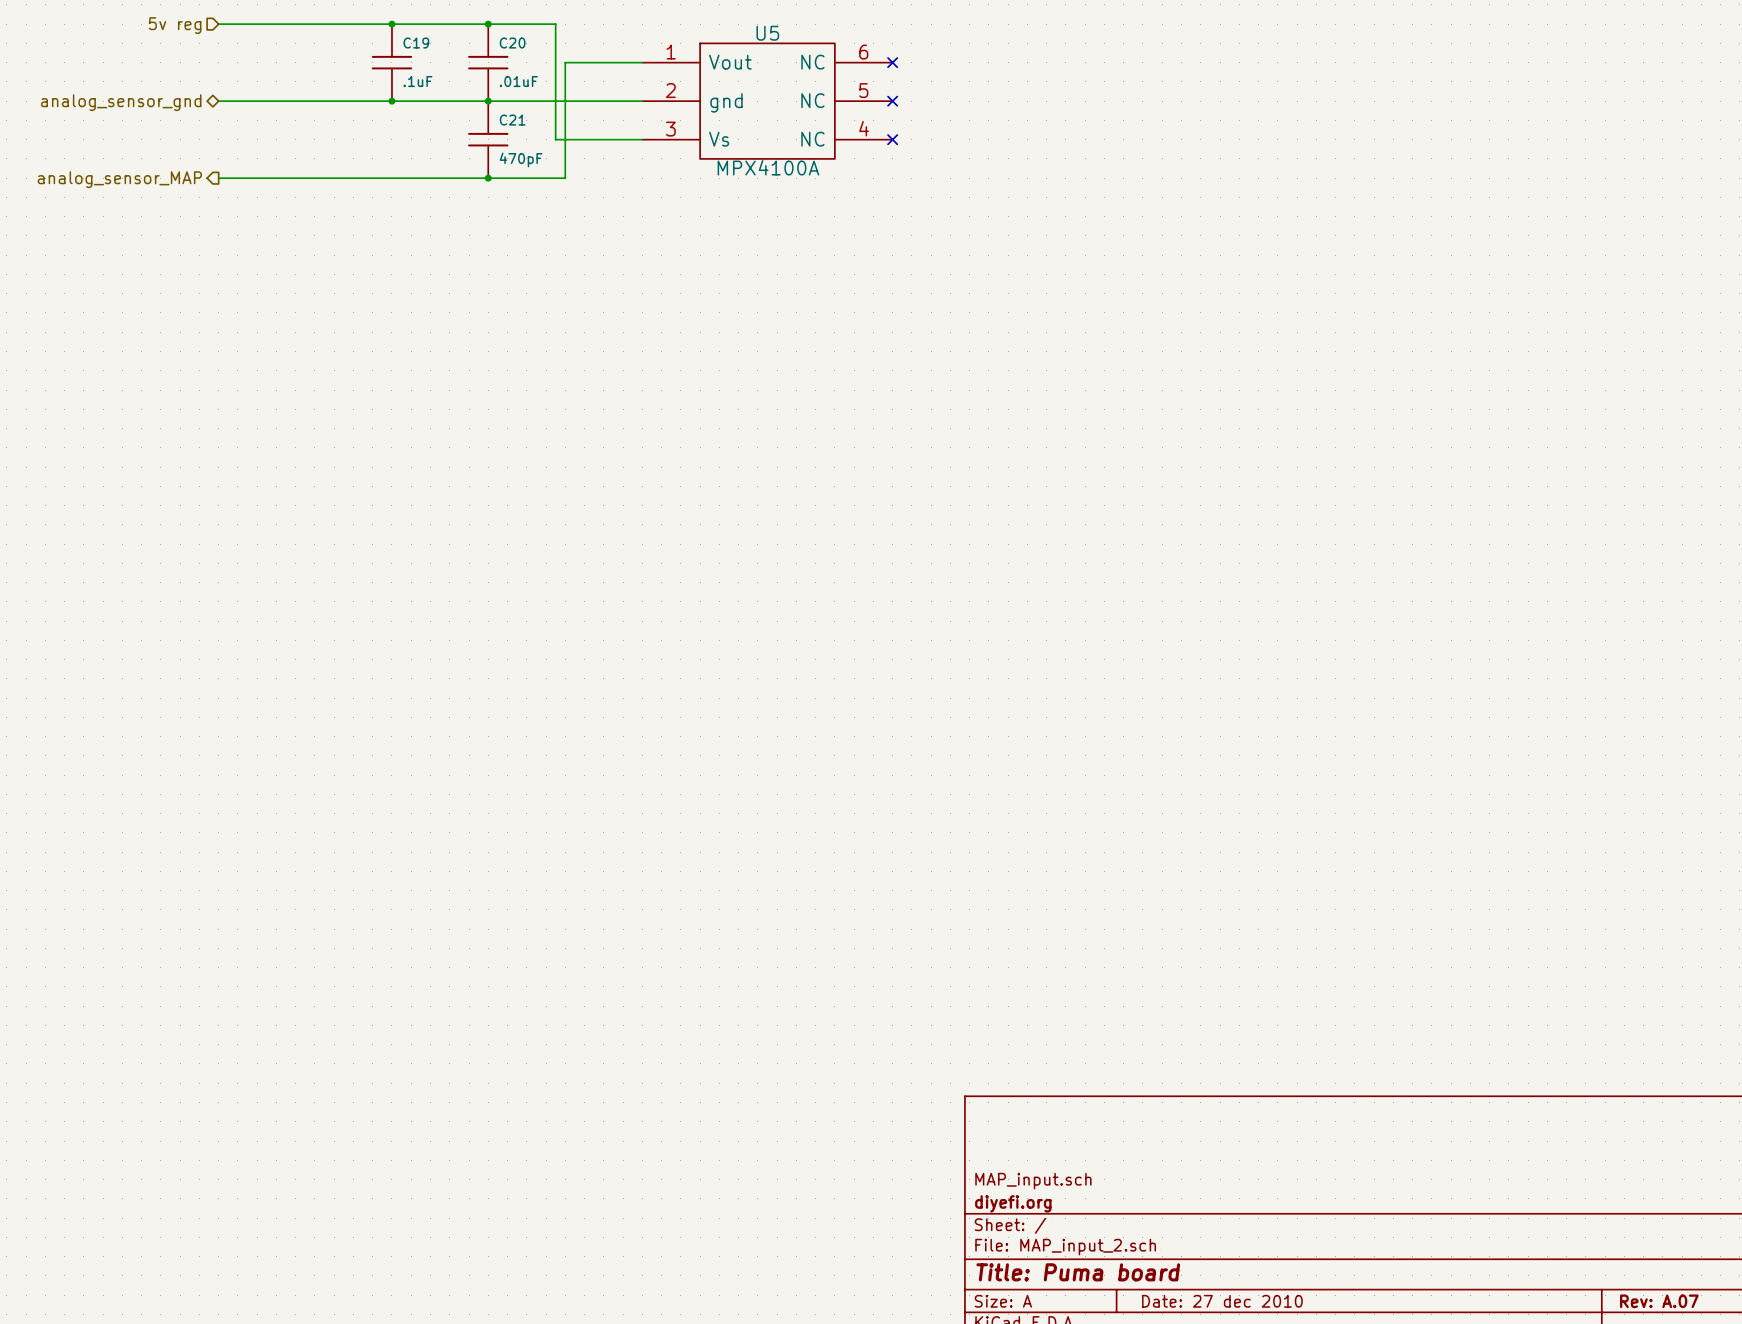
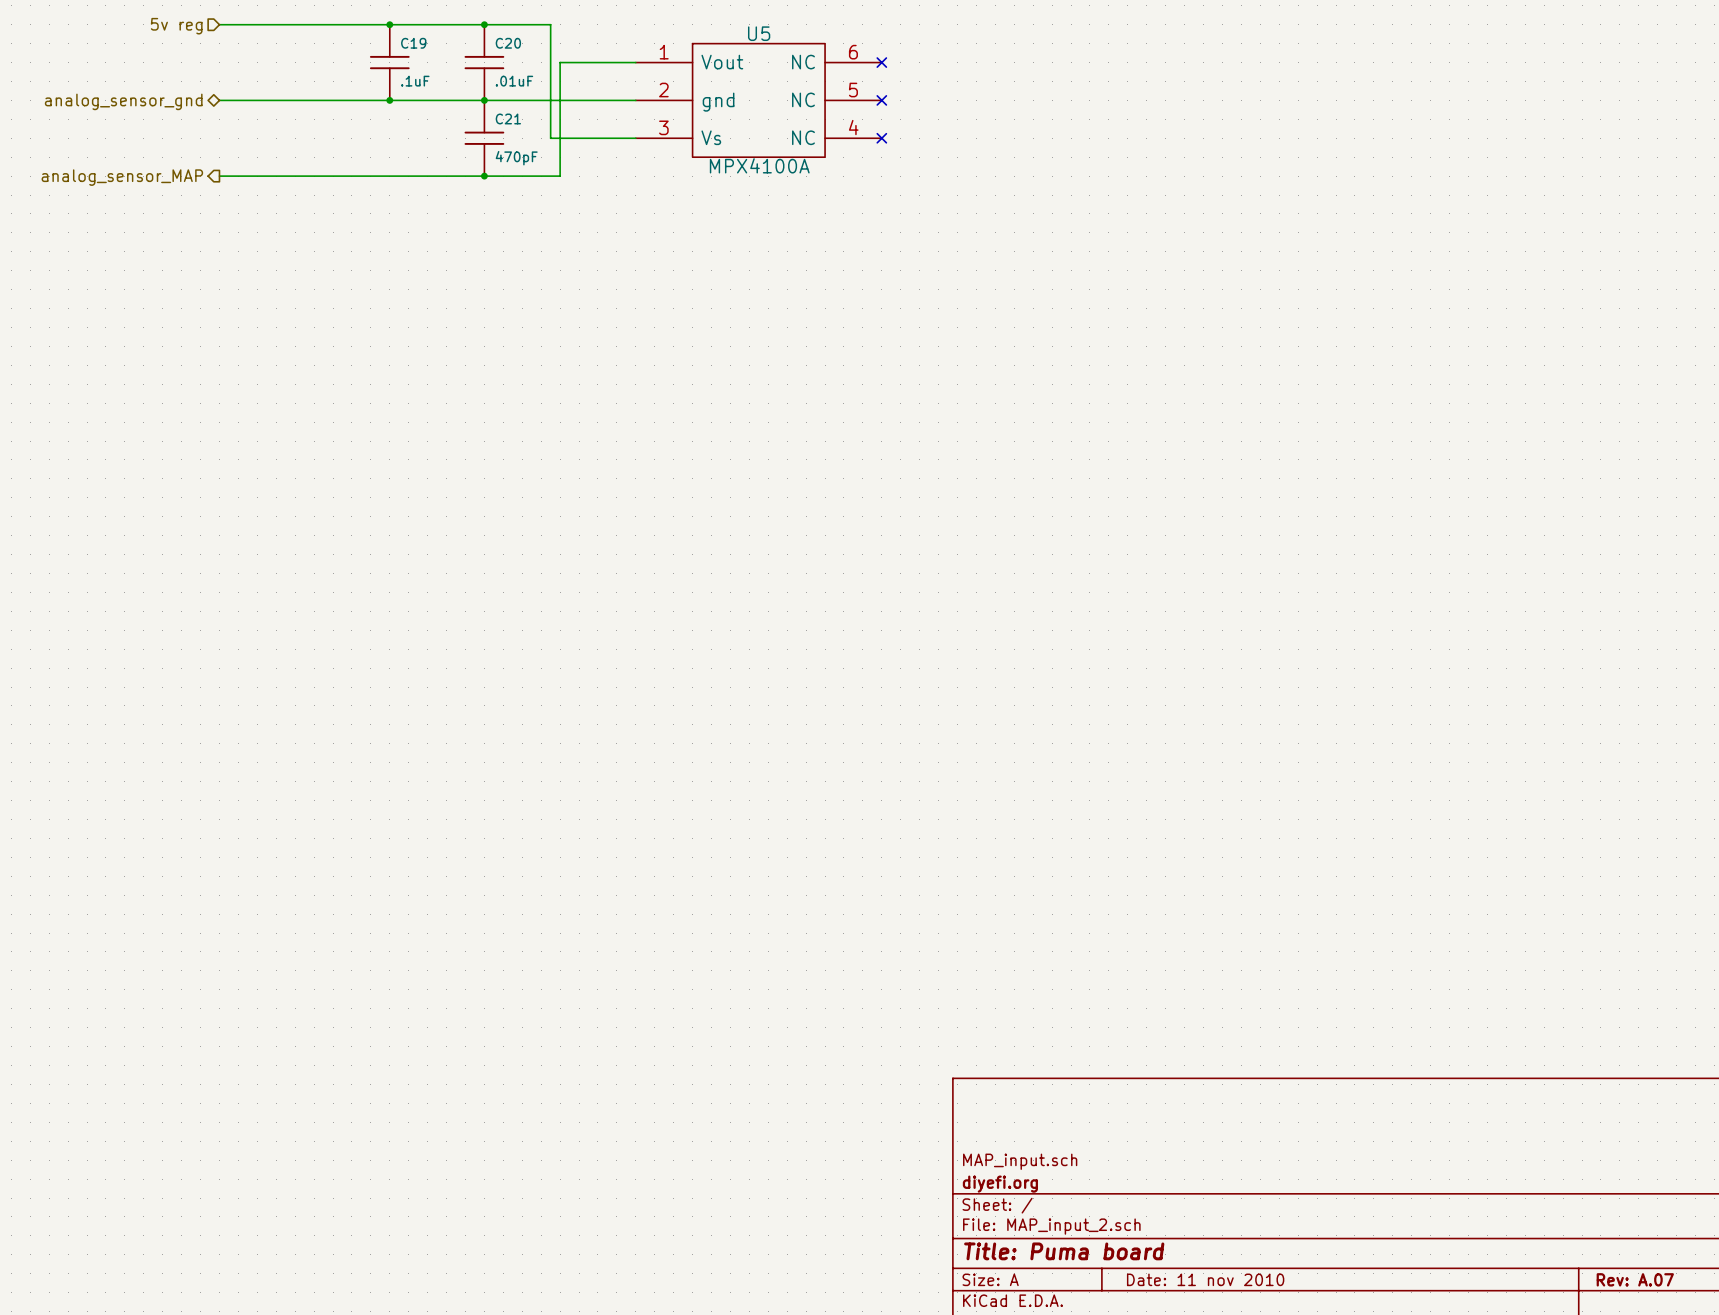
title block: Date: 27 dec 2010 (1222, 1301) -> Date: 11 nov 2010 (1205, 1279)

